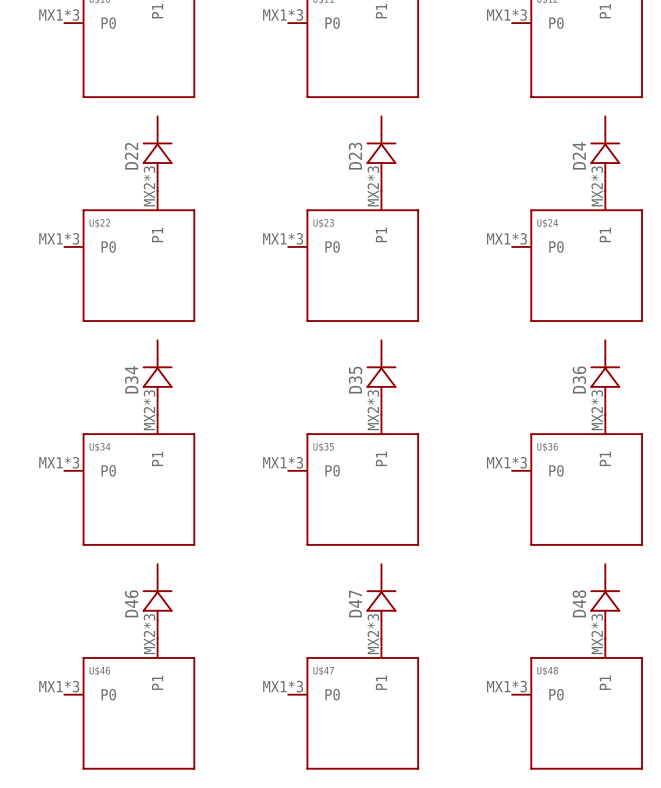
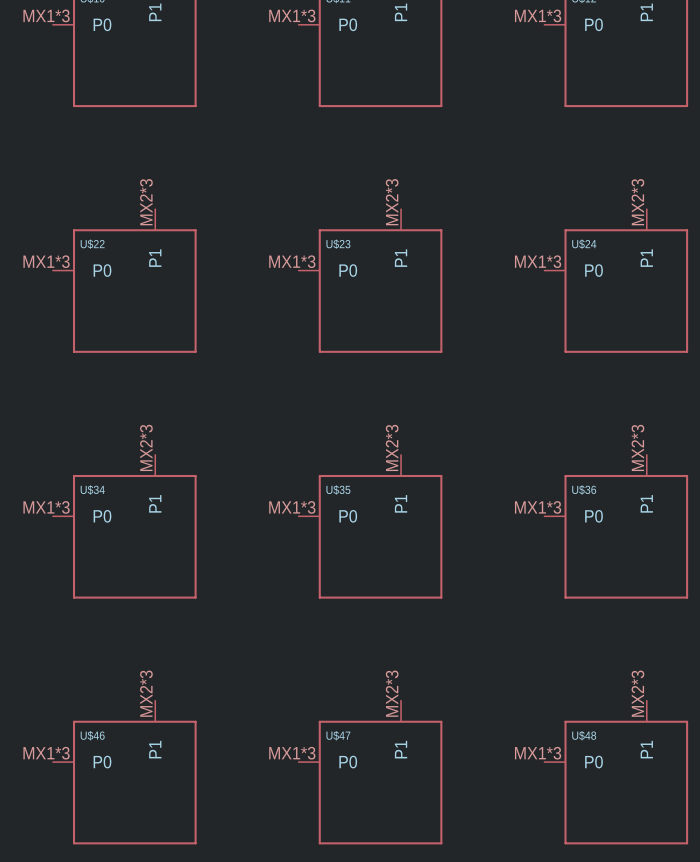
D22: (157, 153) -> none
D23: (381, 153) -> none
D24: (605, 153) -> none
D34: (157, 377) -> none
D35: (381, 377) -> none
D36: (605, 377) -> none
D46: (157, 601) -> none
D47: (381, 601) -> none
D48: (605, 601) -> none

